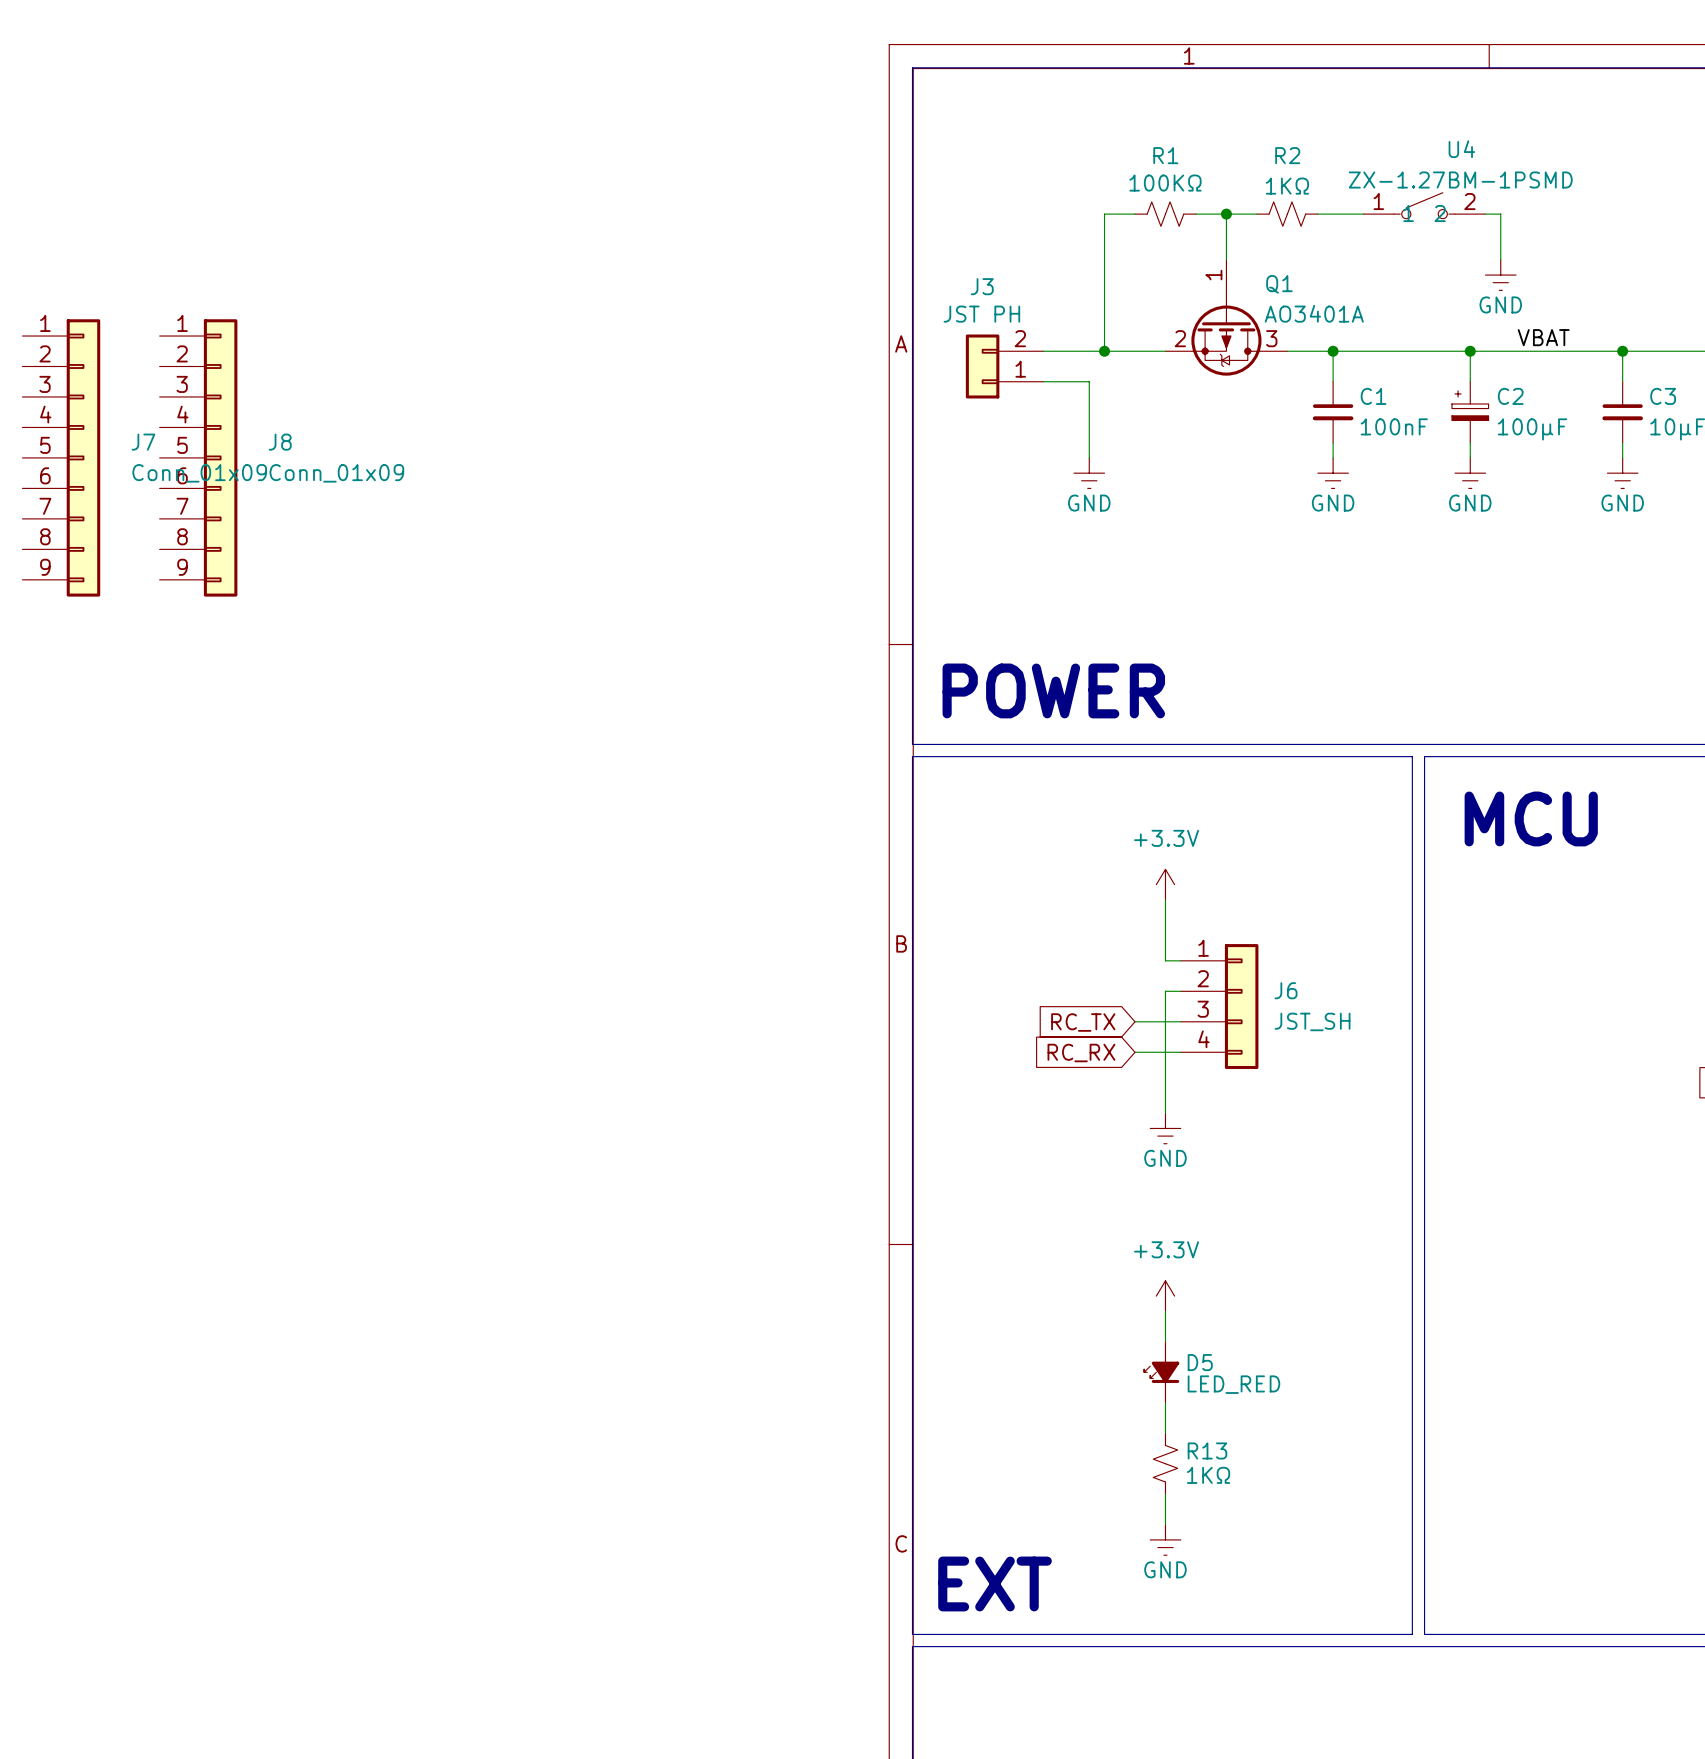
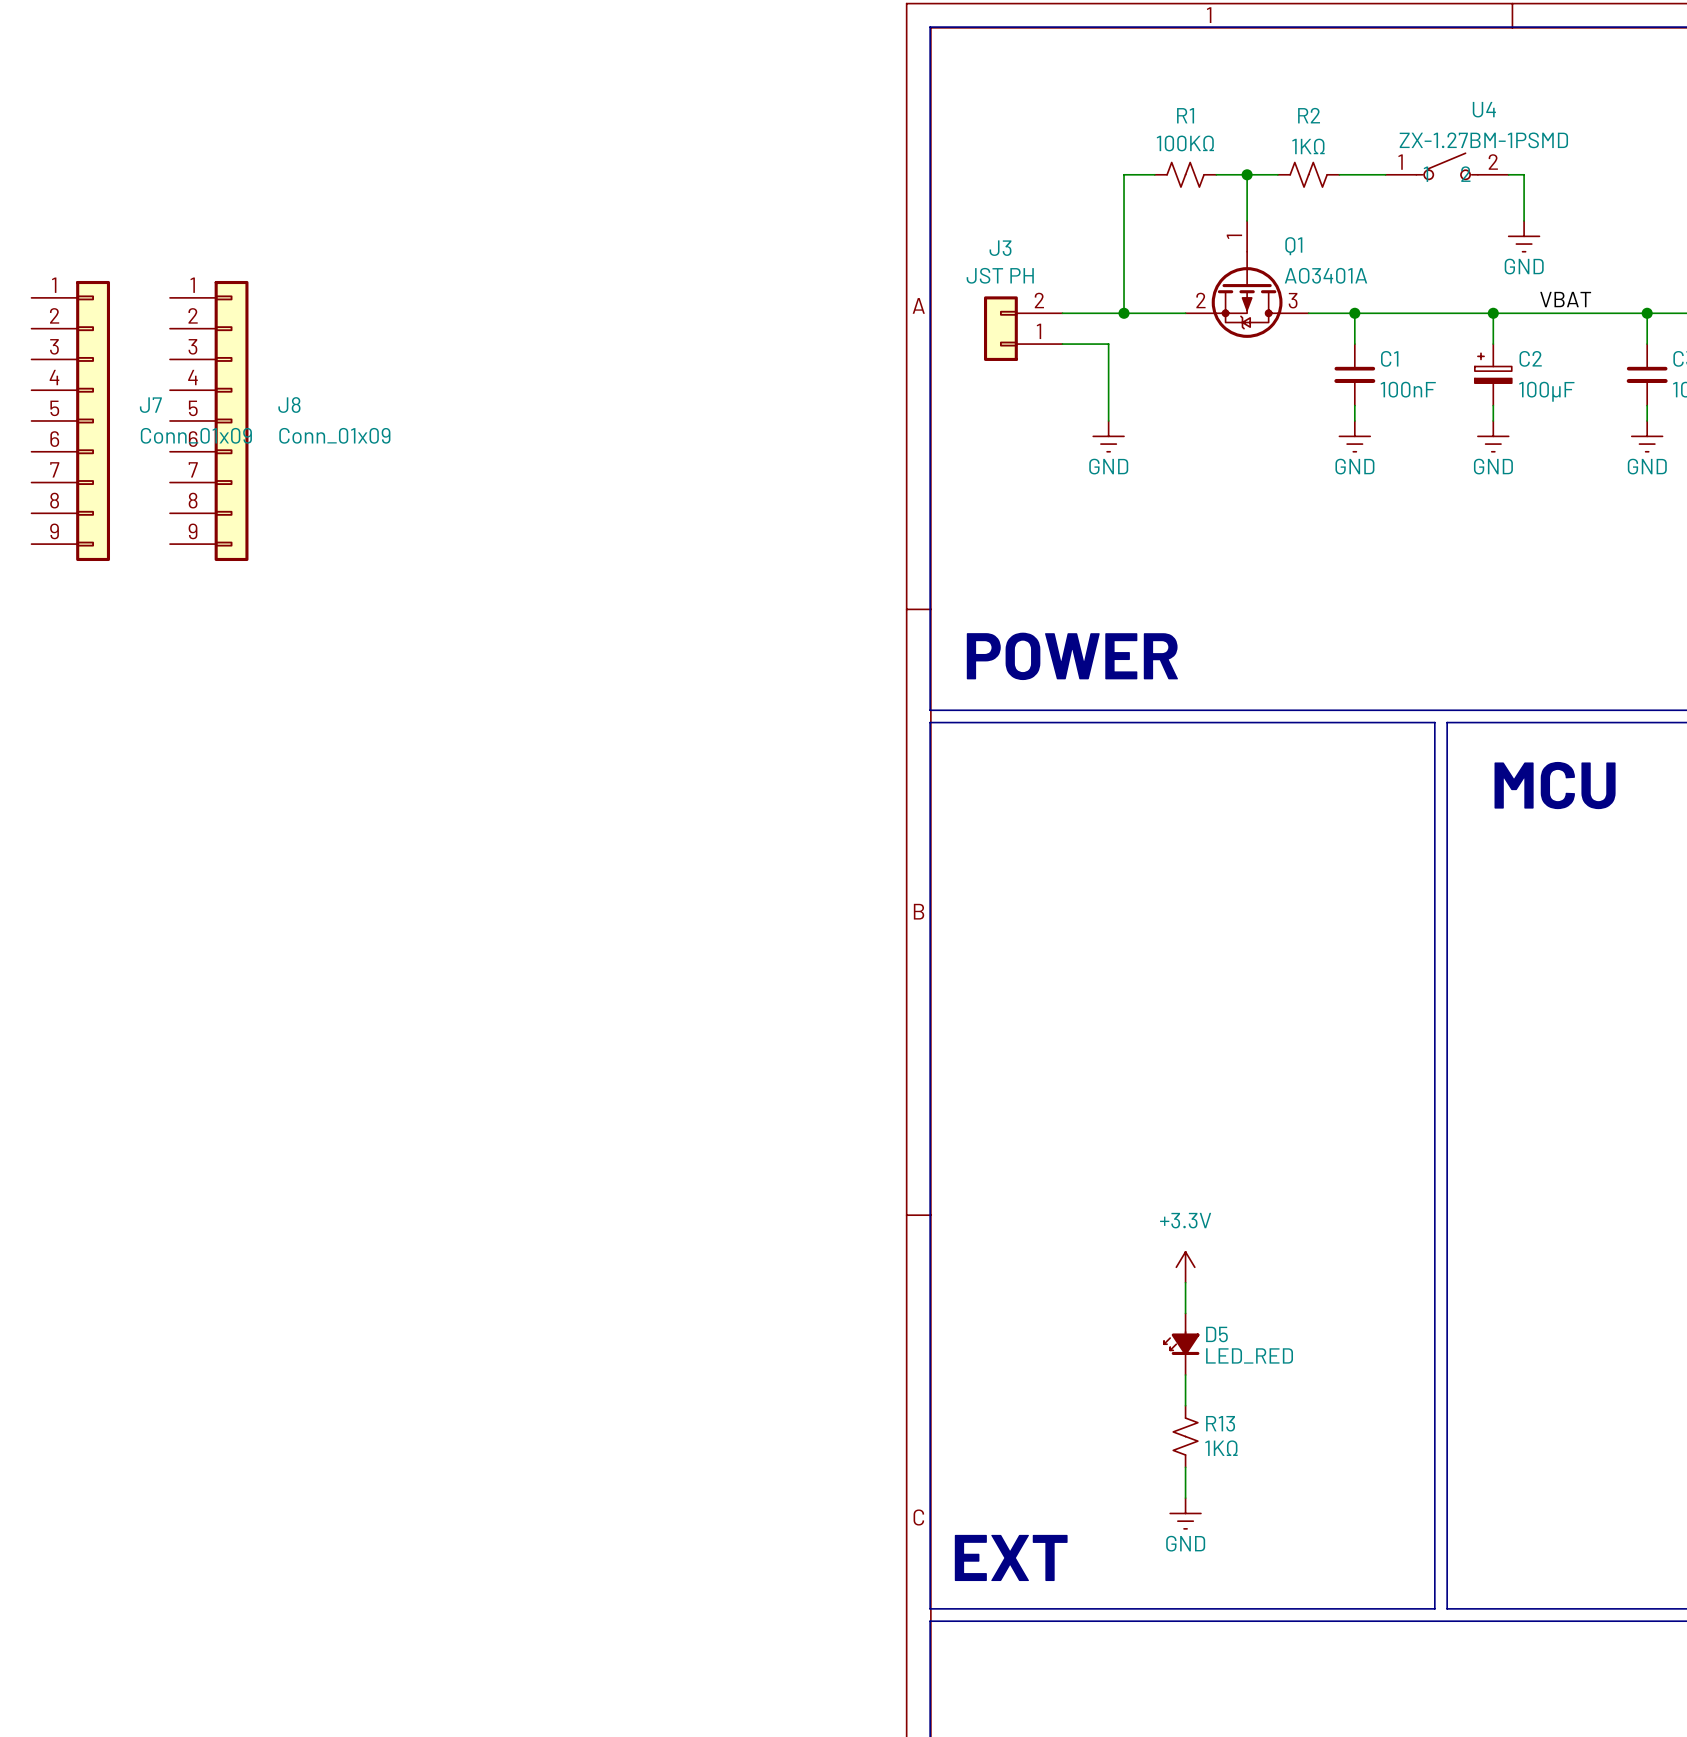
power symbol: +3.3V (1165, 884) -> none
wire: (1165, 899) (1165, 960) (1180, 960) -> none
wire: (1180, 991) (1165, 991) (1165, 1113) -> none
J6: JST_SH (1219, 1006) -> none
wire: (1135, 1021) (1180, 1021) -> none
global label: RC_TX (1083, 1022) -> none
wire: (1135, 1052) (1180, 1052) -> none
global label: RC_RX (1081, 1053) -> none
power symbol: GND (1165, 1128) -> none

